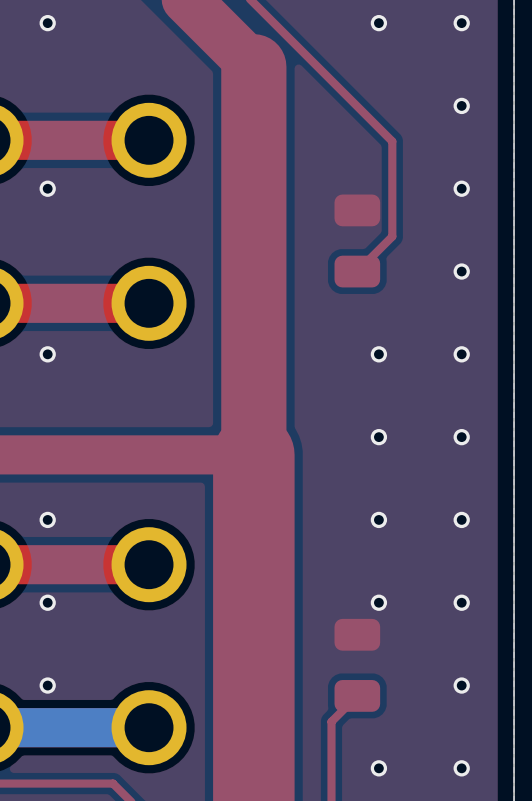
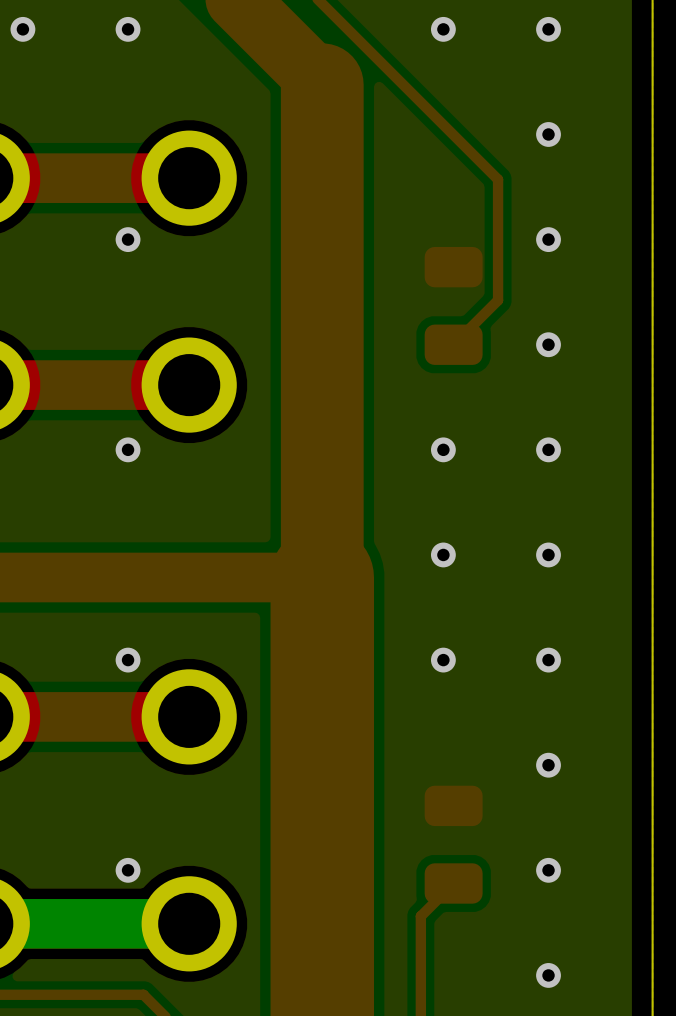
via: none -> (22, 29)
via: (47, 23) -> none
via: none -> (128, 29)
via: none -> (443, 29)
via: (378, 23) -> none
via: none -> (548, 29)
via: (461, 23) -> none
via: none -> (548, 134)
via: (461, 105) -> none
via: (47, 188) -> none
via: none -> (128, 239)
via: none -> (548, 239)
via: (461, 188) -> none
via: none -> (548, 344)
via: (461, 271) -> none
via: (47, 354) -> none
via: none -> (128, 449)
via: none -> (443, 449)
via: (378, 354) -> none
via: none -> (548, 449)
via: (461, 354) -> none
via: none -> (443, 554)
via: (378, 437) -> none
via: none -> (548, 554)
via: (461, 437) -> none
via: (47, 519) -> none
via: none -> (128, 660)
via: none -> (443, 660)
via: (378, 519) -> none
via: none -> (548, 660)
via: (461, 519) -> none
via: (47, 602) -> none
via: (378, 602) -> none
via: none -> (548, 765)
via: (461, 602) -> none
via: (47, 685) -> none
via: none -> (128, 870)
via: none -> (548, 870)
via: (461, 685) -> none
via: (378, 768) -> none
via: none -> (548, 975)
via: (461, 768) -> none

